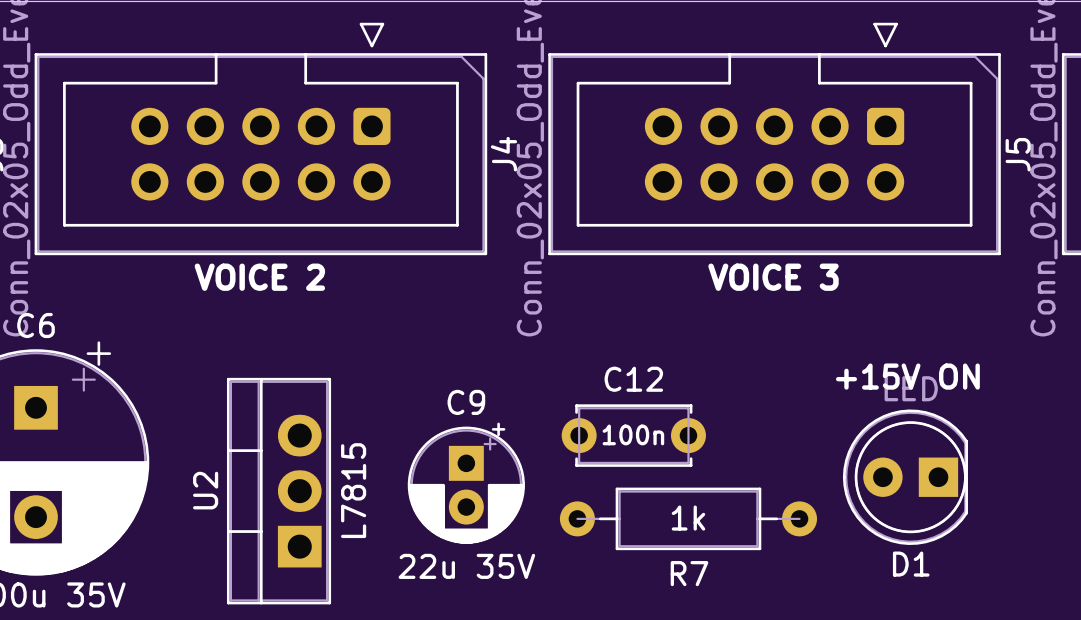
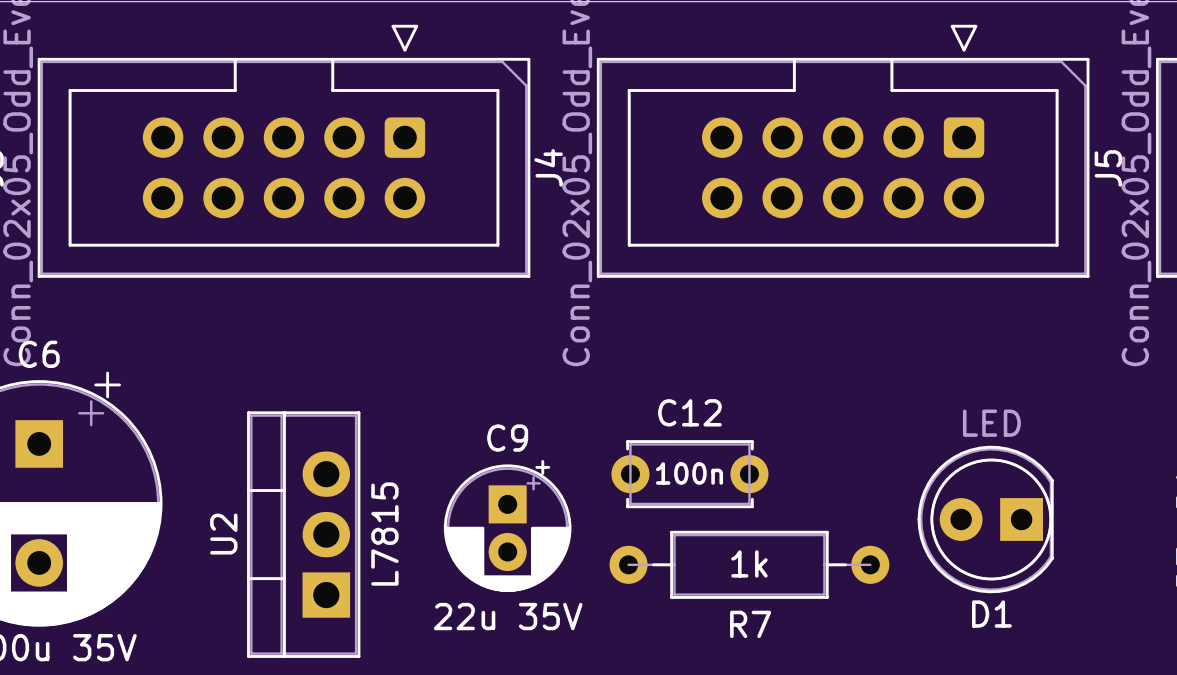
text: VOICE 2 (259, 277) -> none
text: VOICE 3 (773, 277) -> none
text: +15V ON (907, 376) -> none

